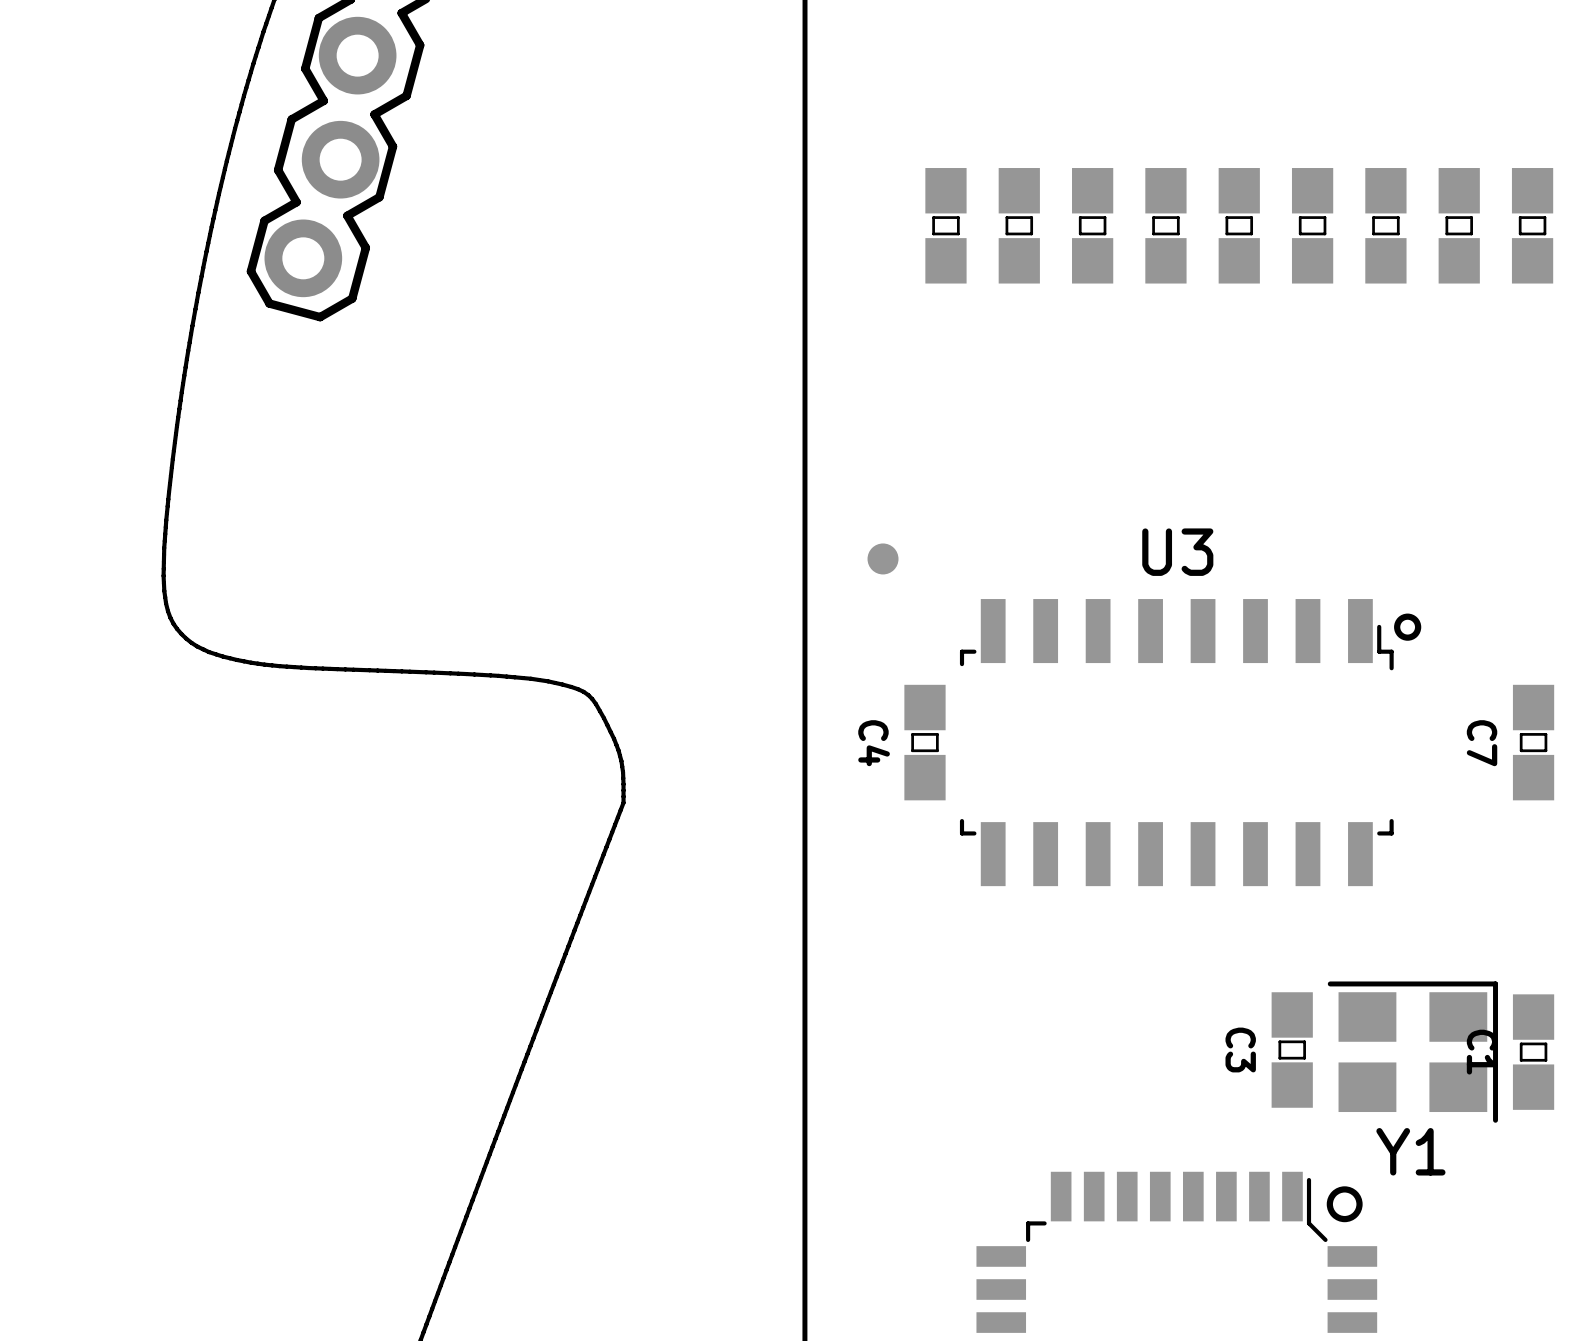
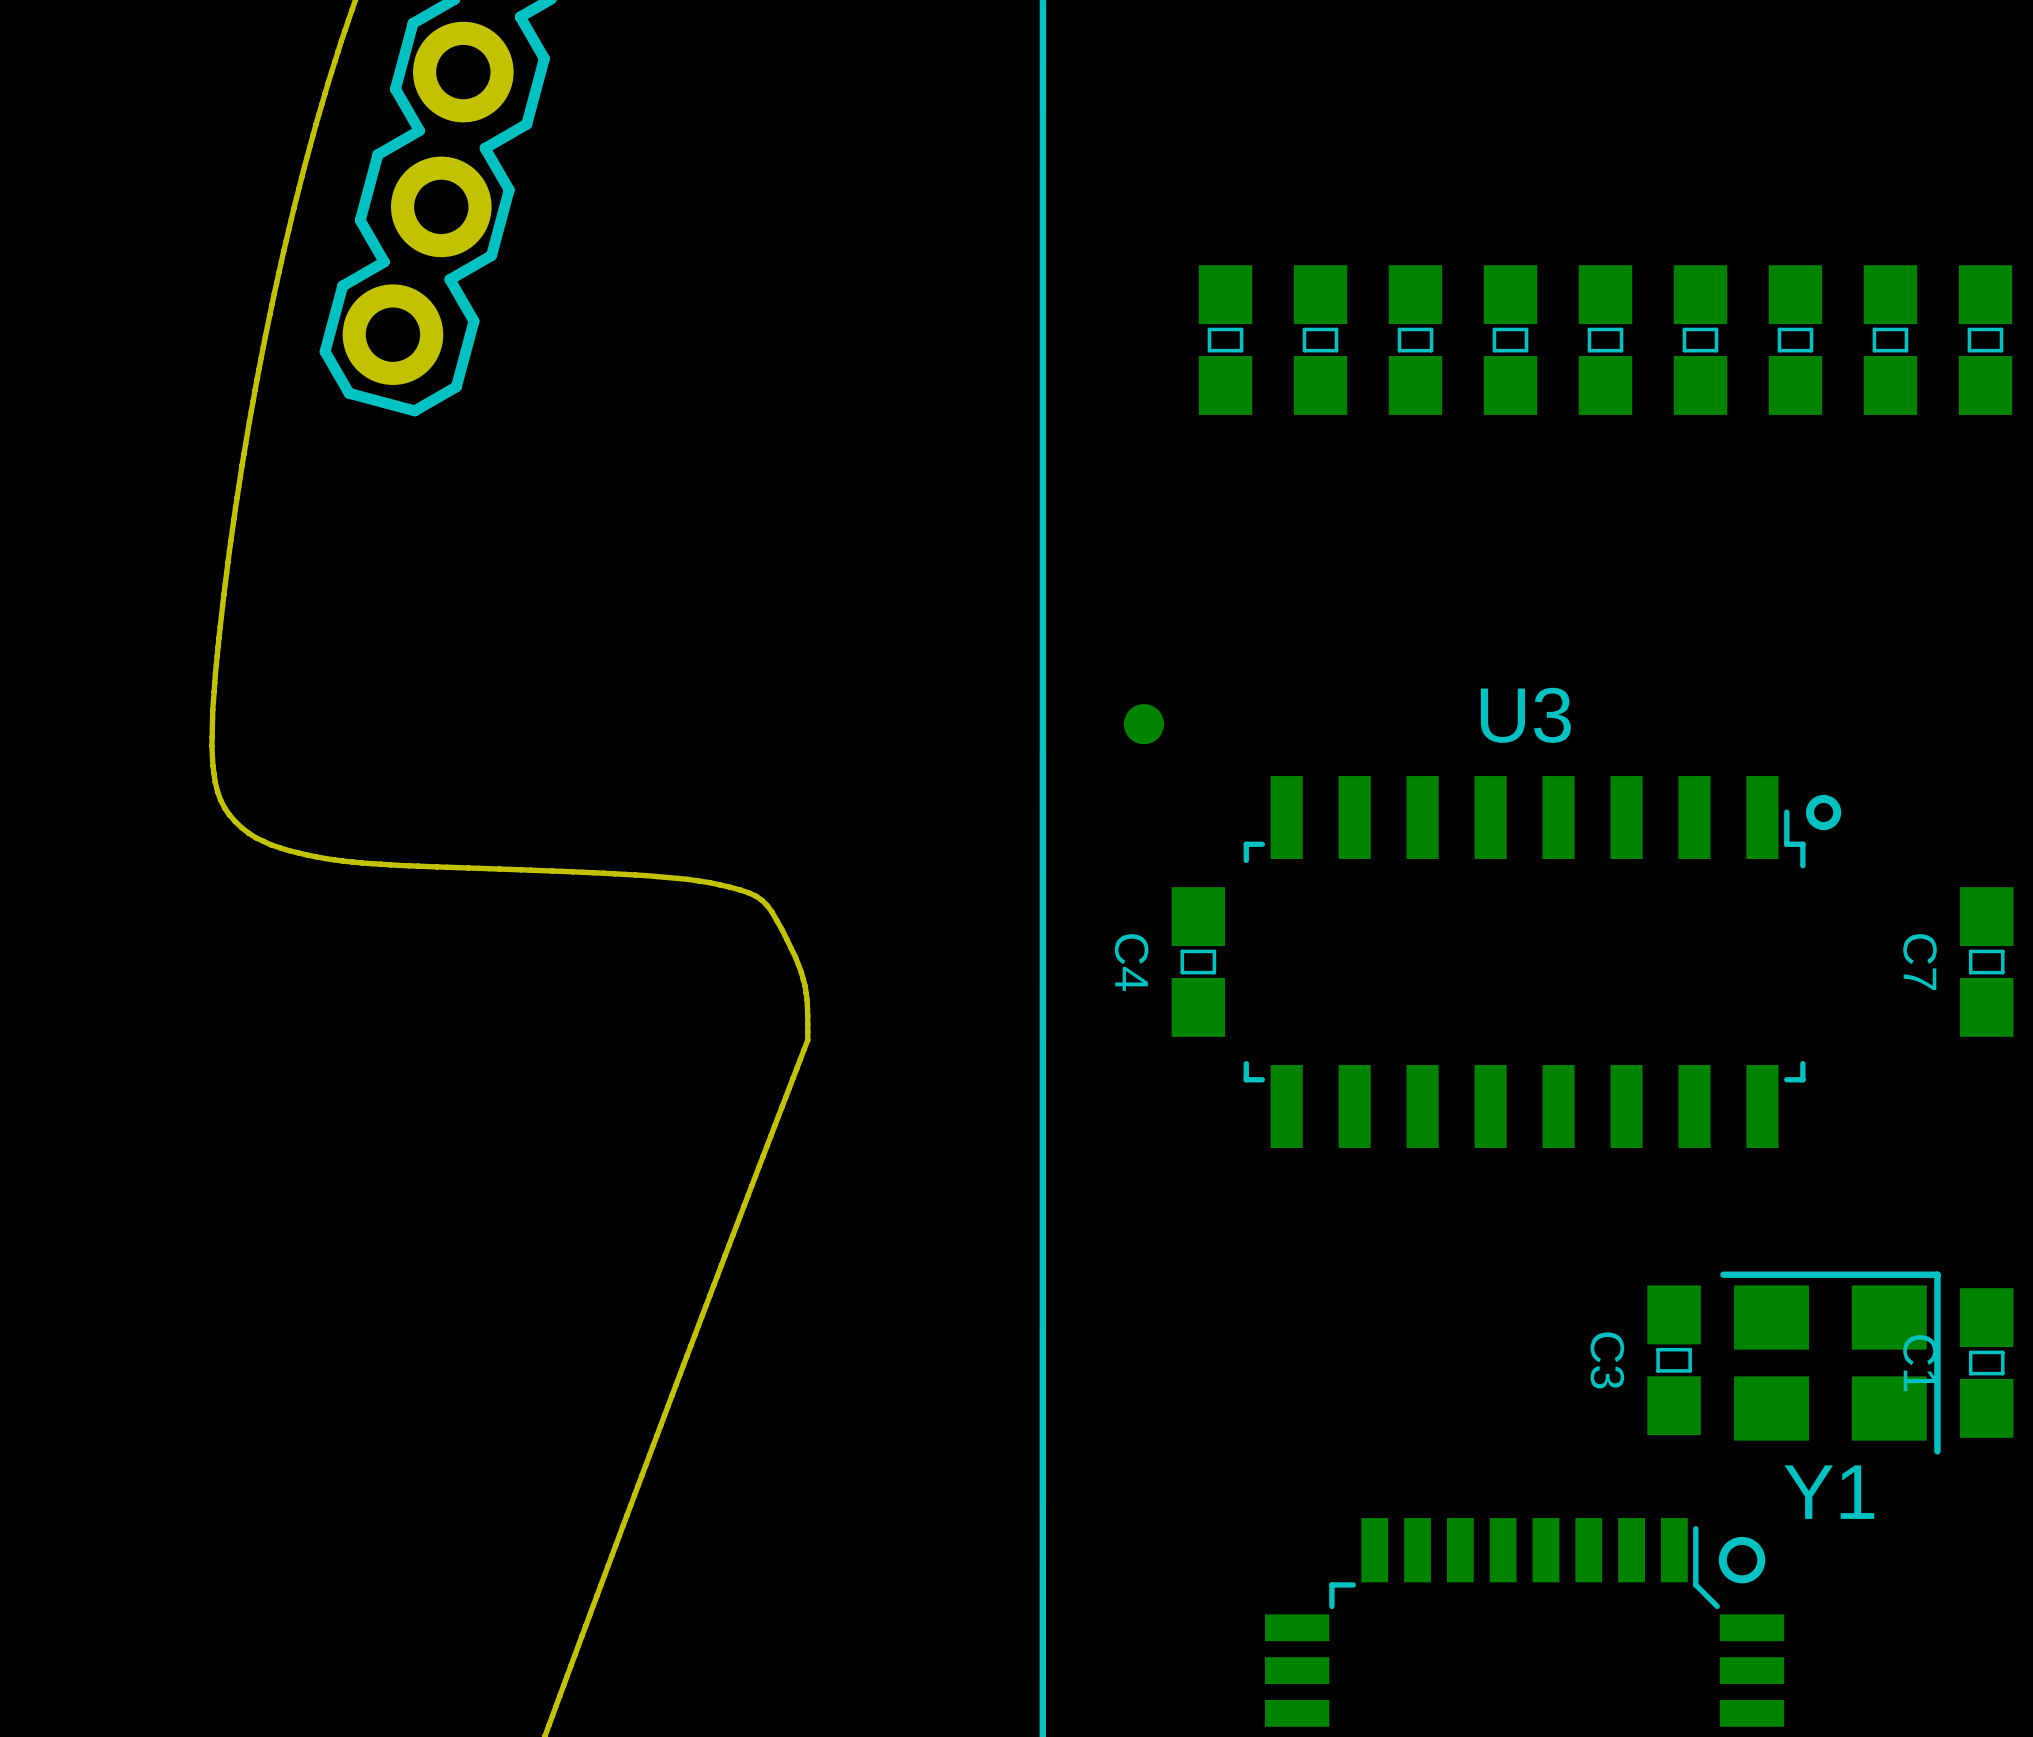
part position: (945, 225) -> (1225, 340)
part position: (1019, 225) -> (1320, 340)
part position: (1092, 225) -> (1415, 340)
part position: (1165, 225) -> (1510, 340)
part position: (1239, 225) -> (1605, 340)
part position: (1312, 225) -> (1700, 340)
part position: (1385, 225) -> (1795, 340)
part position: (1459, 225) -> (1890, 340)
part position: (1532, 225) -> (1985, 340)

